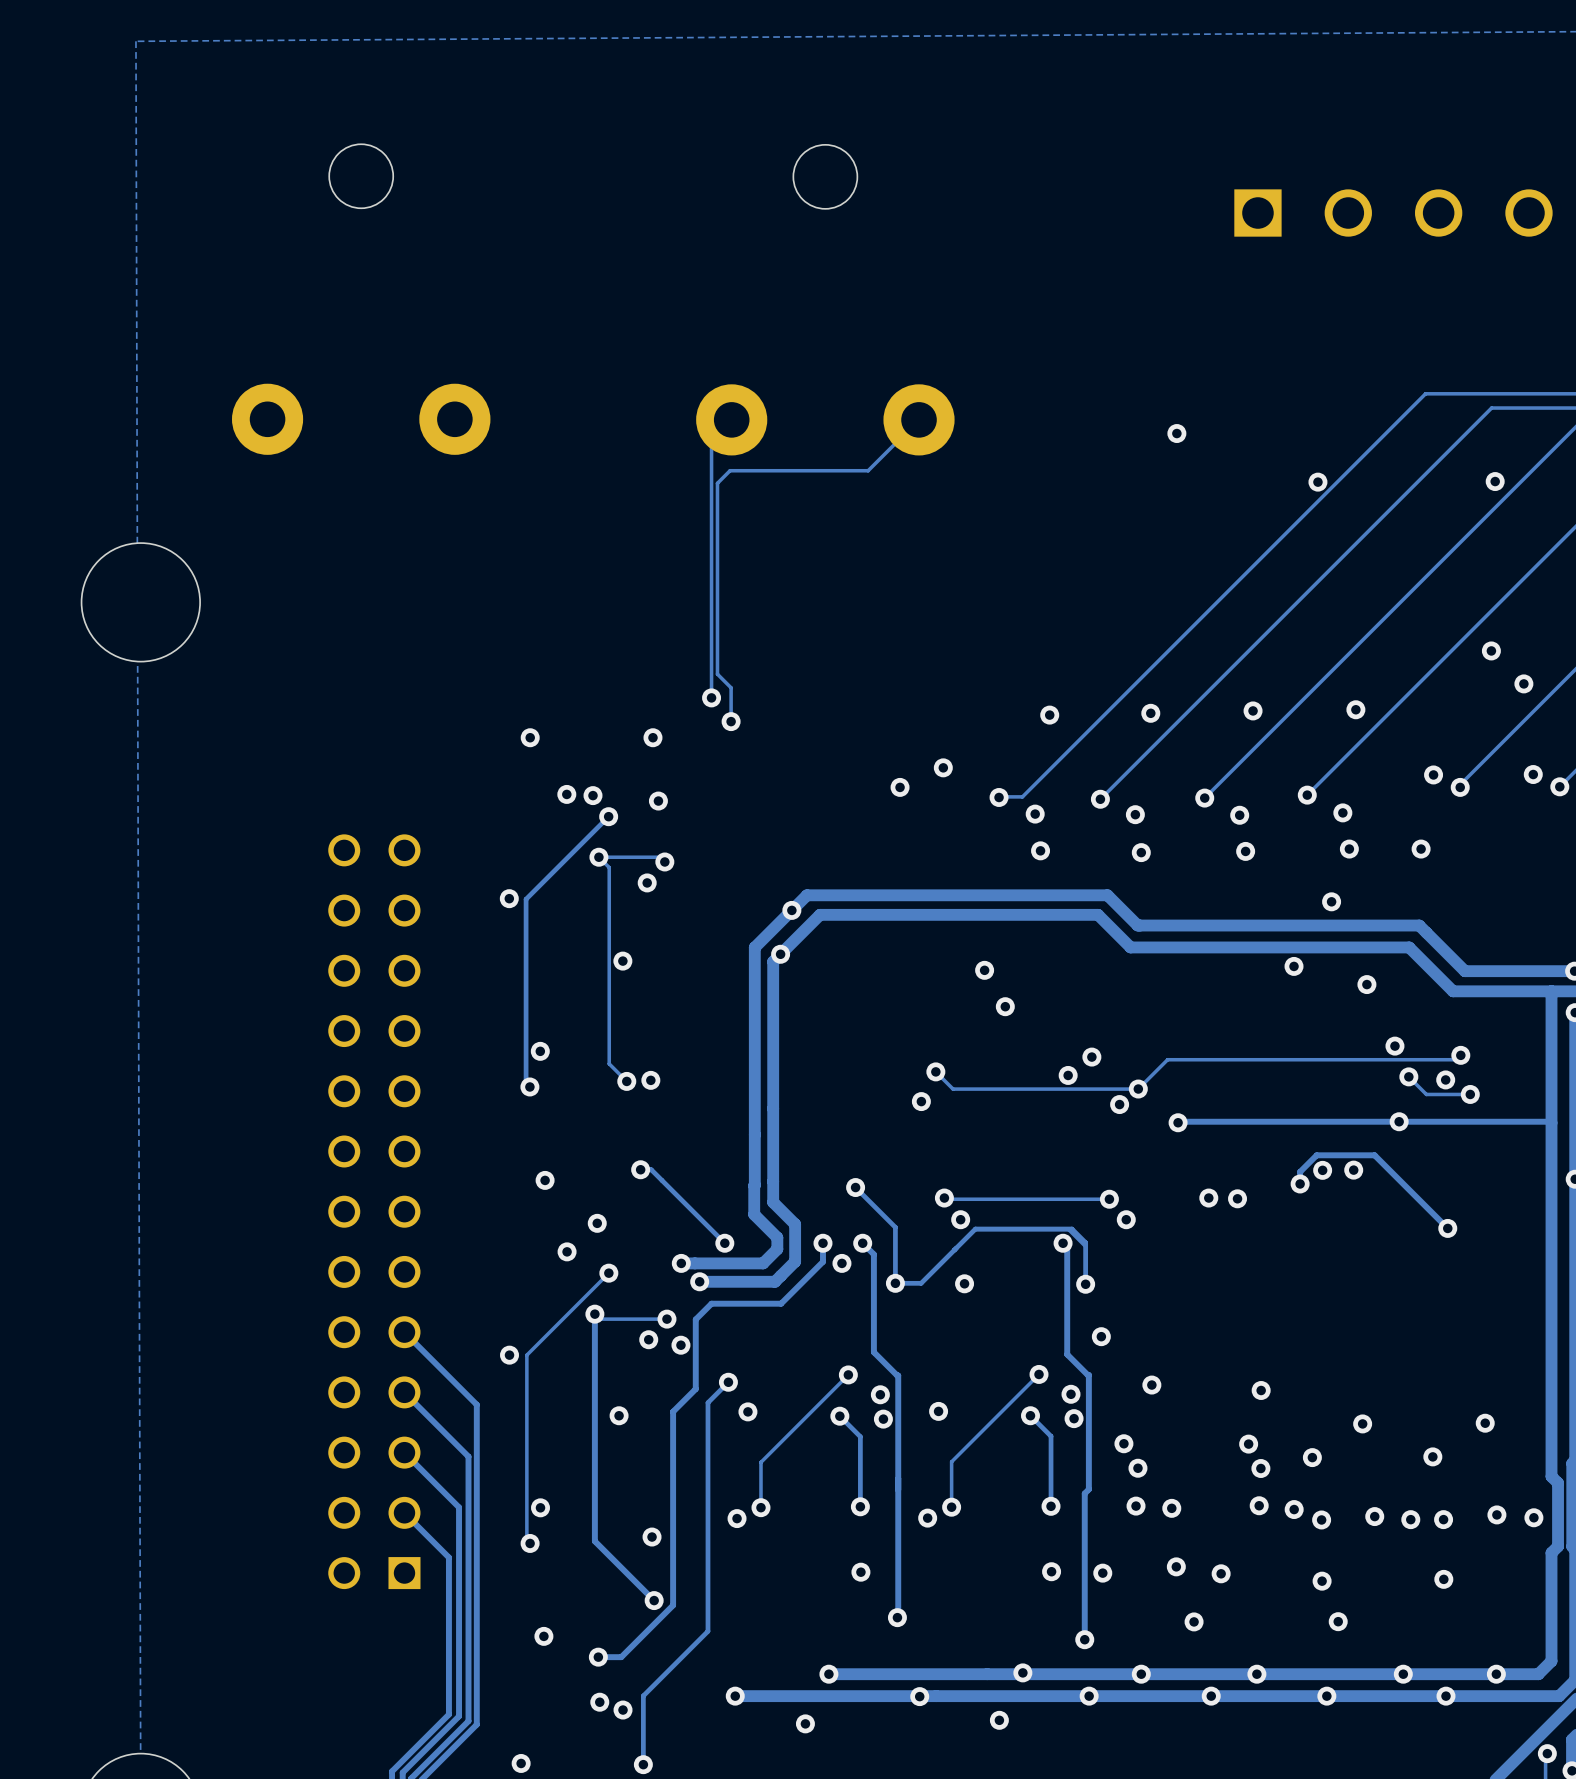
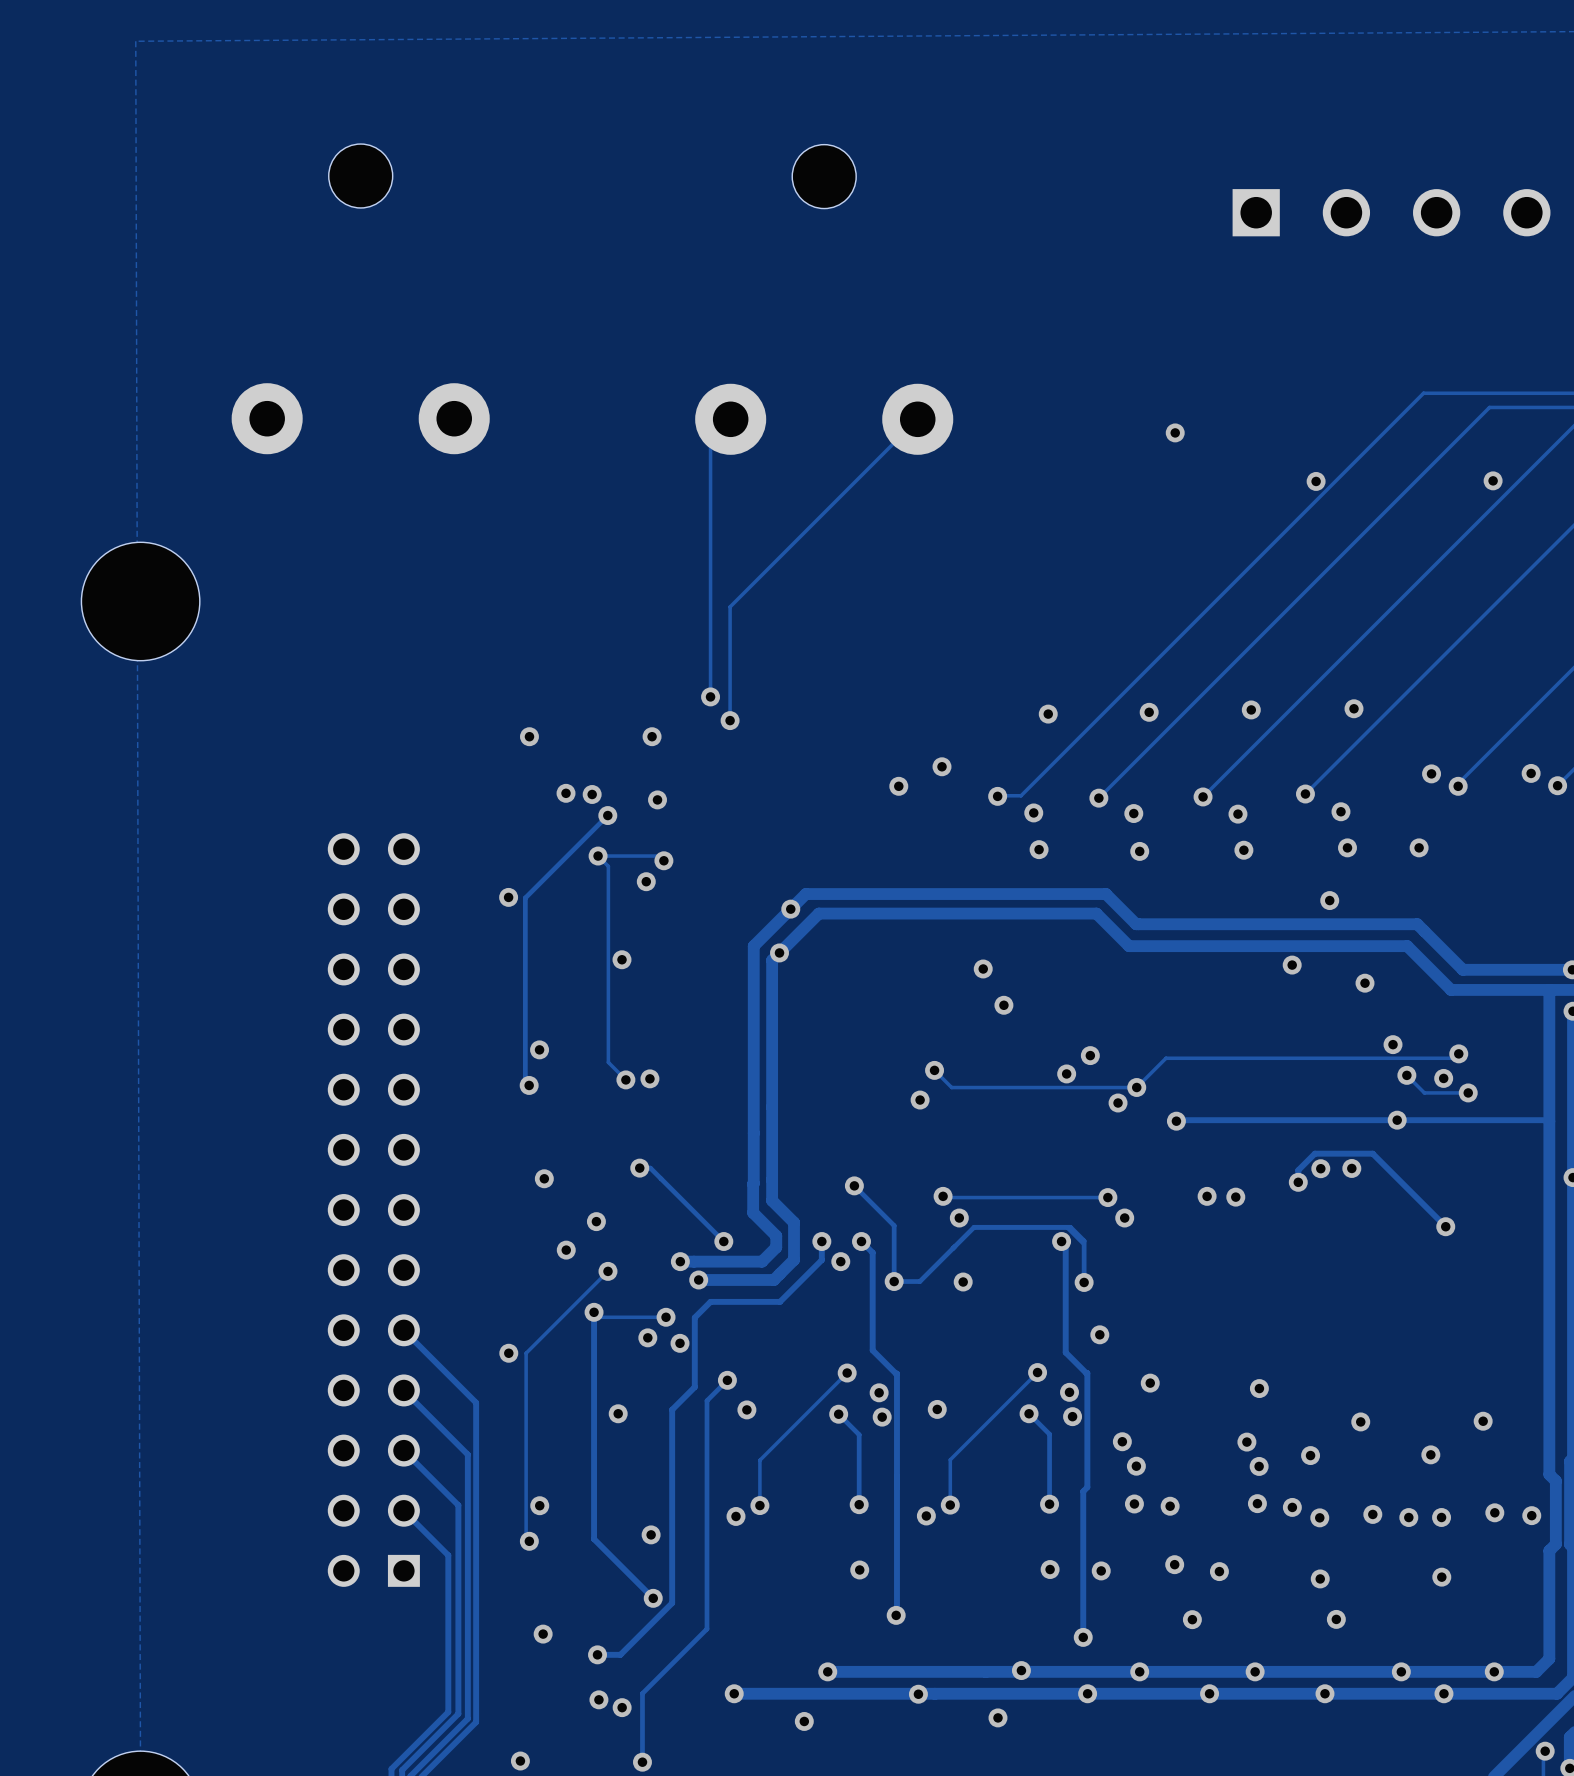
track: (868, 470) (730, 470) (717, 483) (717, 674) (731, 687) -> (866, 470) (730, 606) (730, 686)
via: (1491, 650) -> none
via: (1523, 683) -> none

